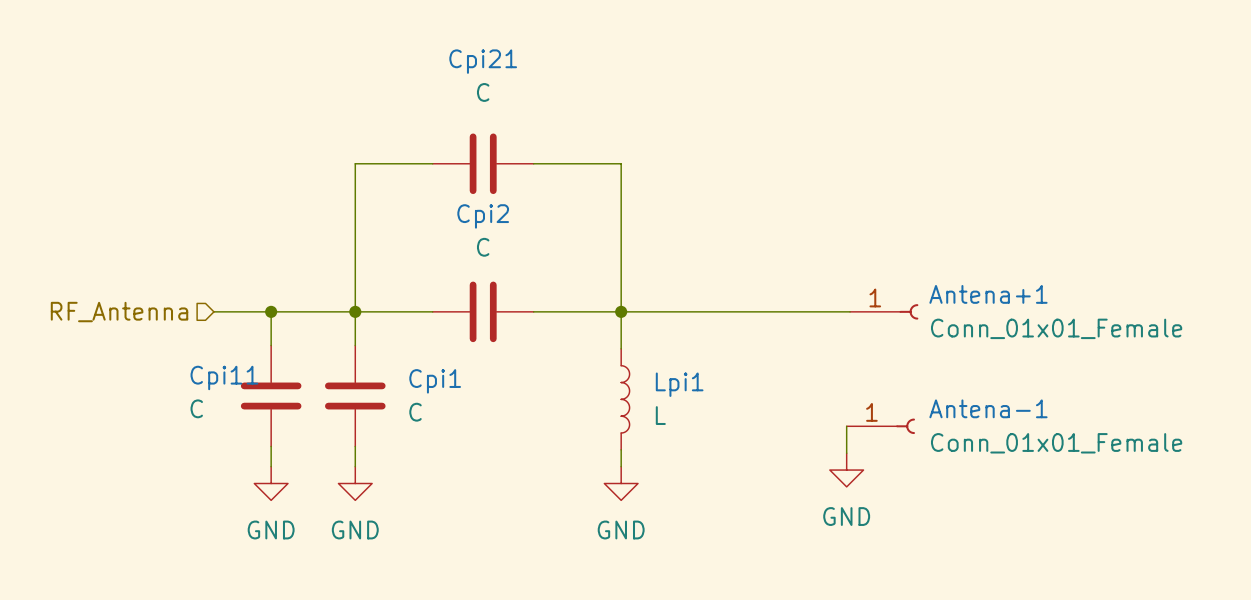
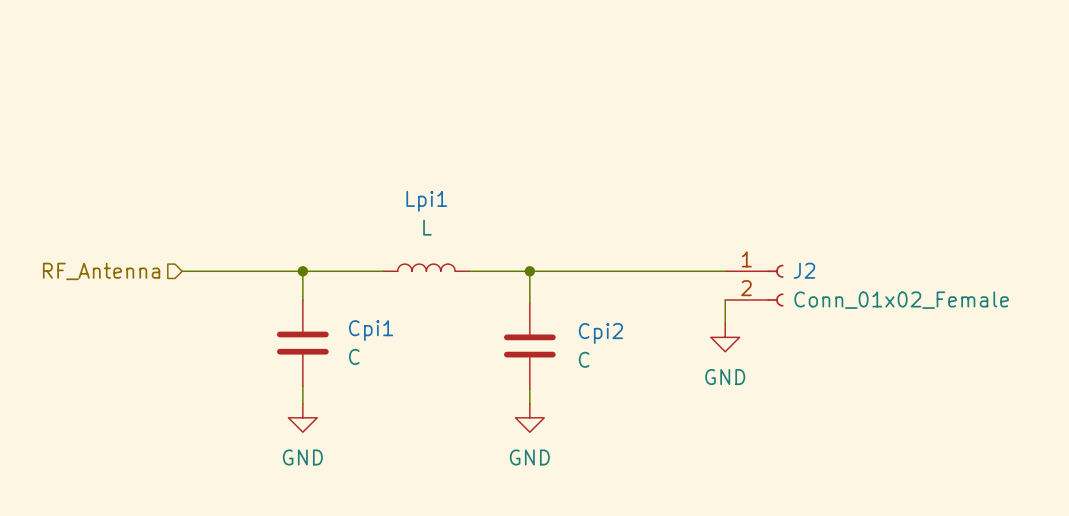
wire: (432, 163) (355, 163) (355, 311) -> none
Cpi21: C (483, 163) -> none
wire: (533, 163) (621, 163) (621, 311) -> none
wire: (271, 311) (271, 345) -> none
junction: (271, 311) -> none
Cpi2 rotation: 0° (483, 311) -> 90° clockwise (529, 345)
Cpi2 position: (483, 311) -> (529, 345)
Antena+1: Conn_01x01_Female (884, 311) -> none
J2: none -> Conn_01x02_Female (754, 285)
Cpi11: C (271, 396) -> none
Lpi1 rotation: 0° (625, 399) -> 90° counterclockwise (426, 267)
Lpi1 position: (625, 399) -> (426, 267)
wire: (846, 426) (846, 453) -> (725, 300) (725, 322)
Antena-1: Conn_01x01_Female (880, 426) -> none
wire: (271, 446) (271, 466) -> none
power symbol position: GND (846, 470) -> GND (725, 337)
power symbol: GND (271, 483) -> none

